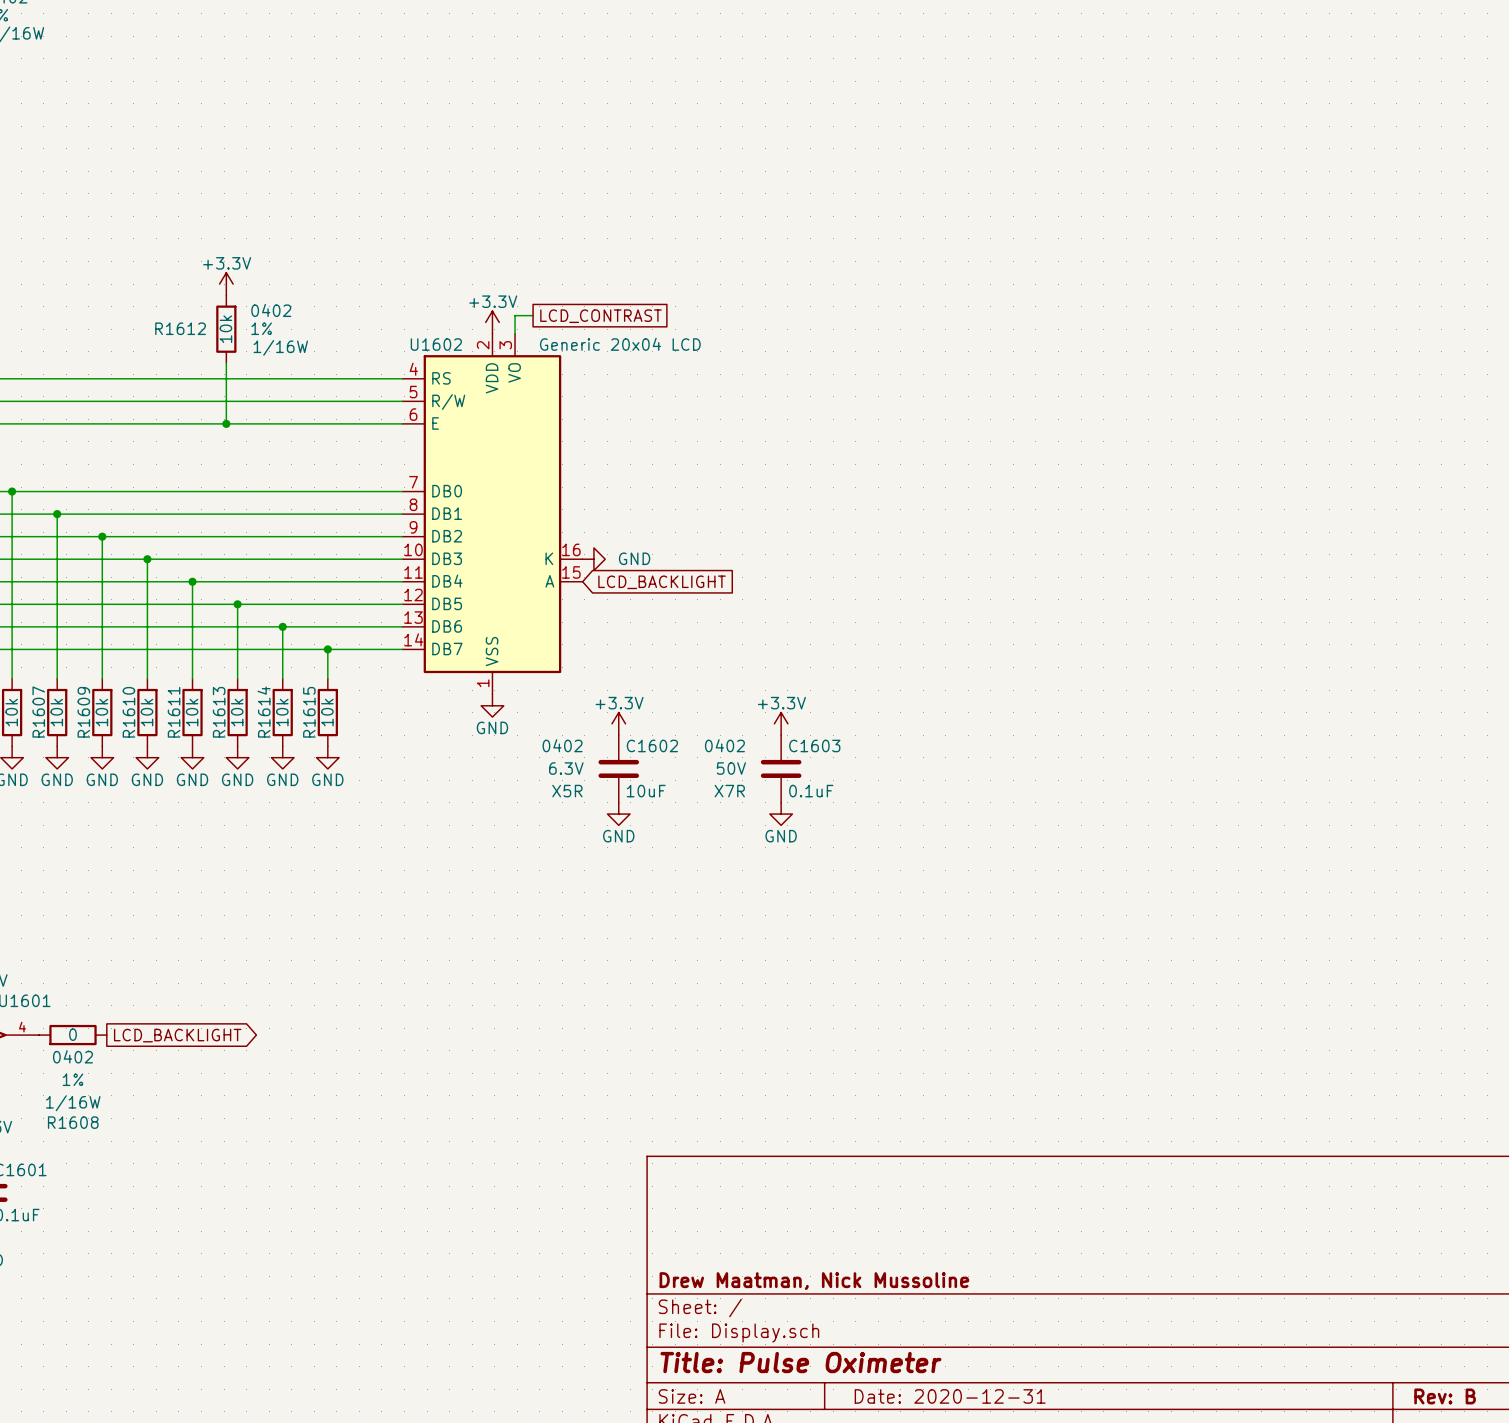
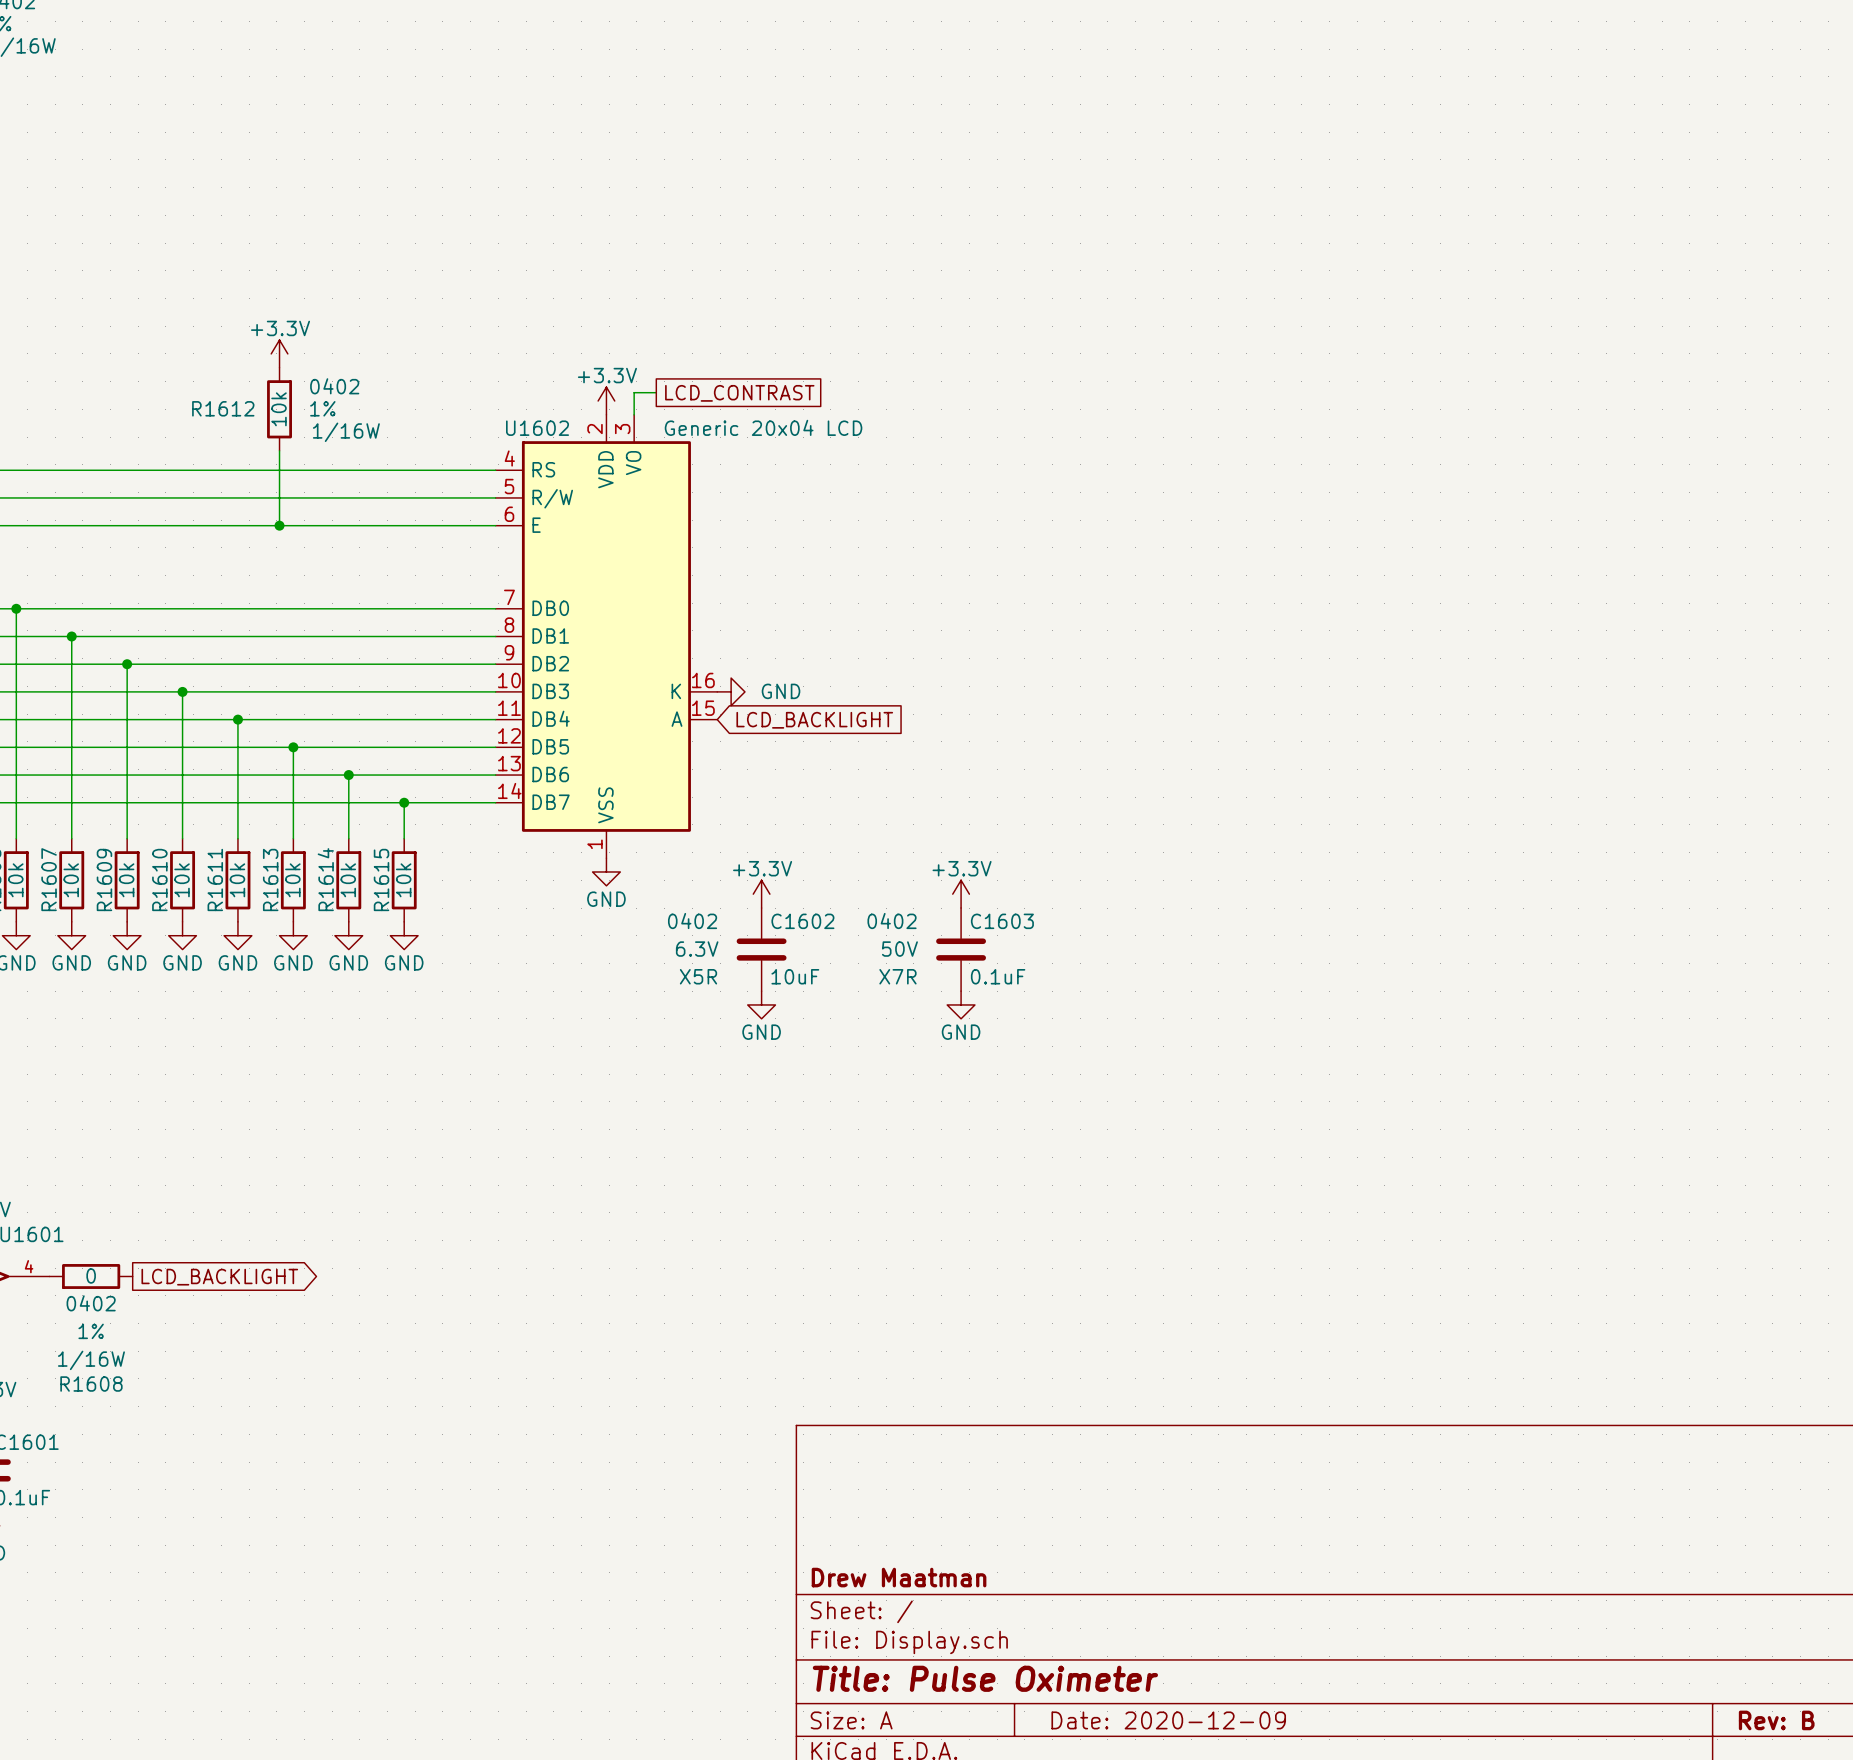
title block: Drew Maatman, Nick Mussoline (814, 1281) -> Drew Maatman (899, 1577)
title block: Date: 2020-12-31 (950, 1396) -> Date: 2020-12-09 (1168, 1720)

